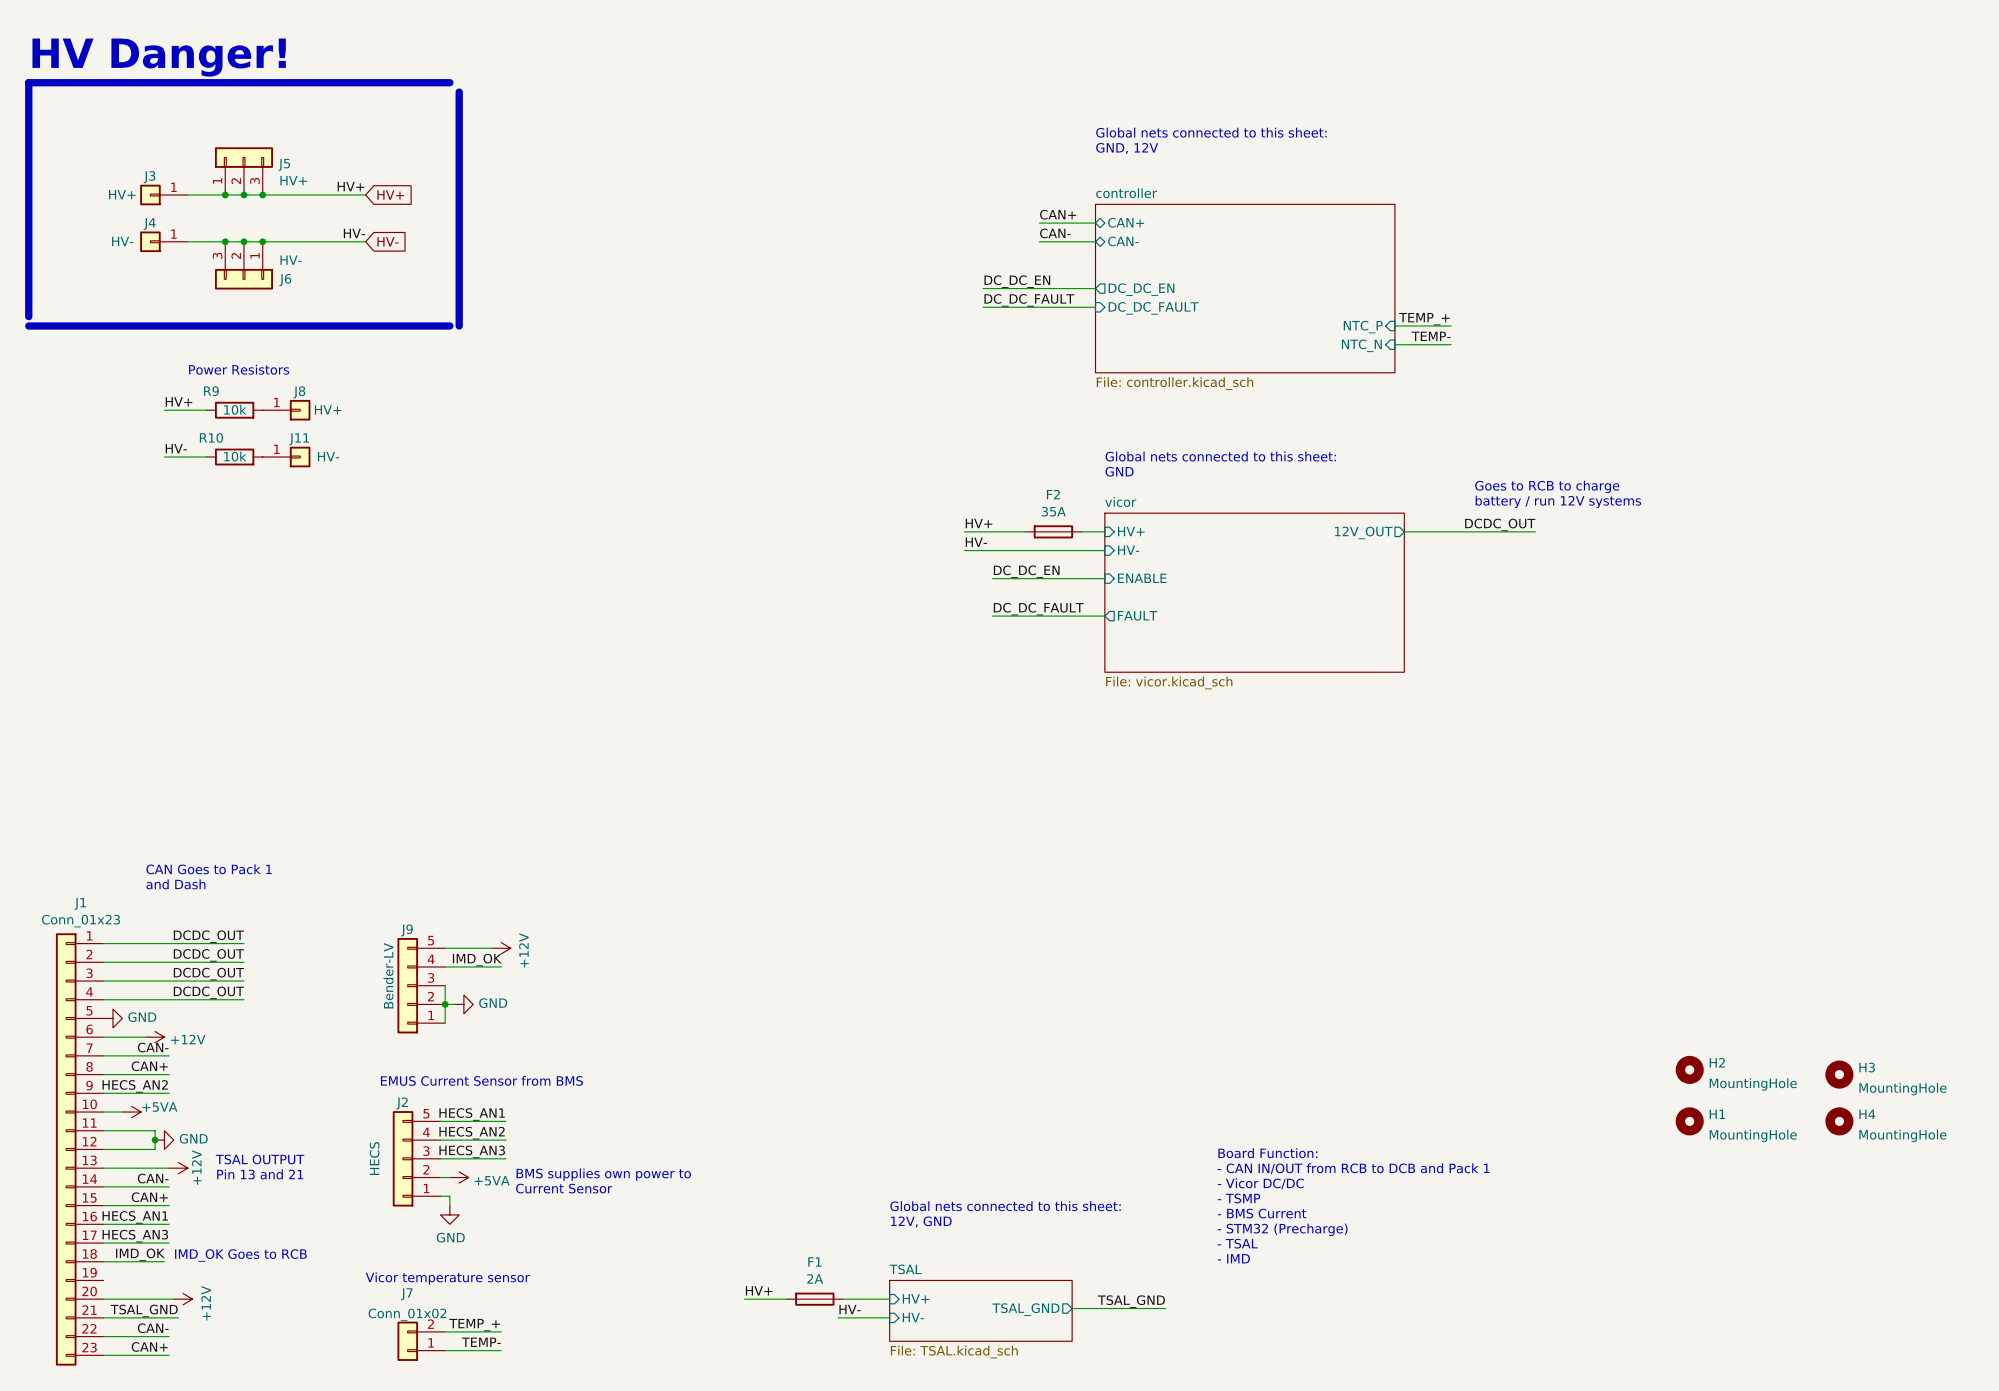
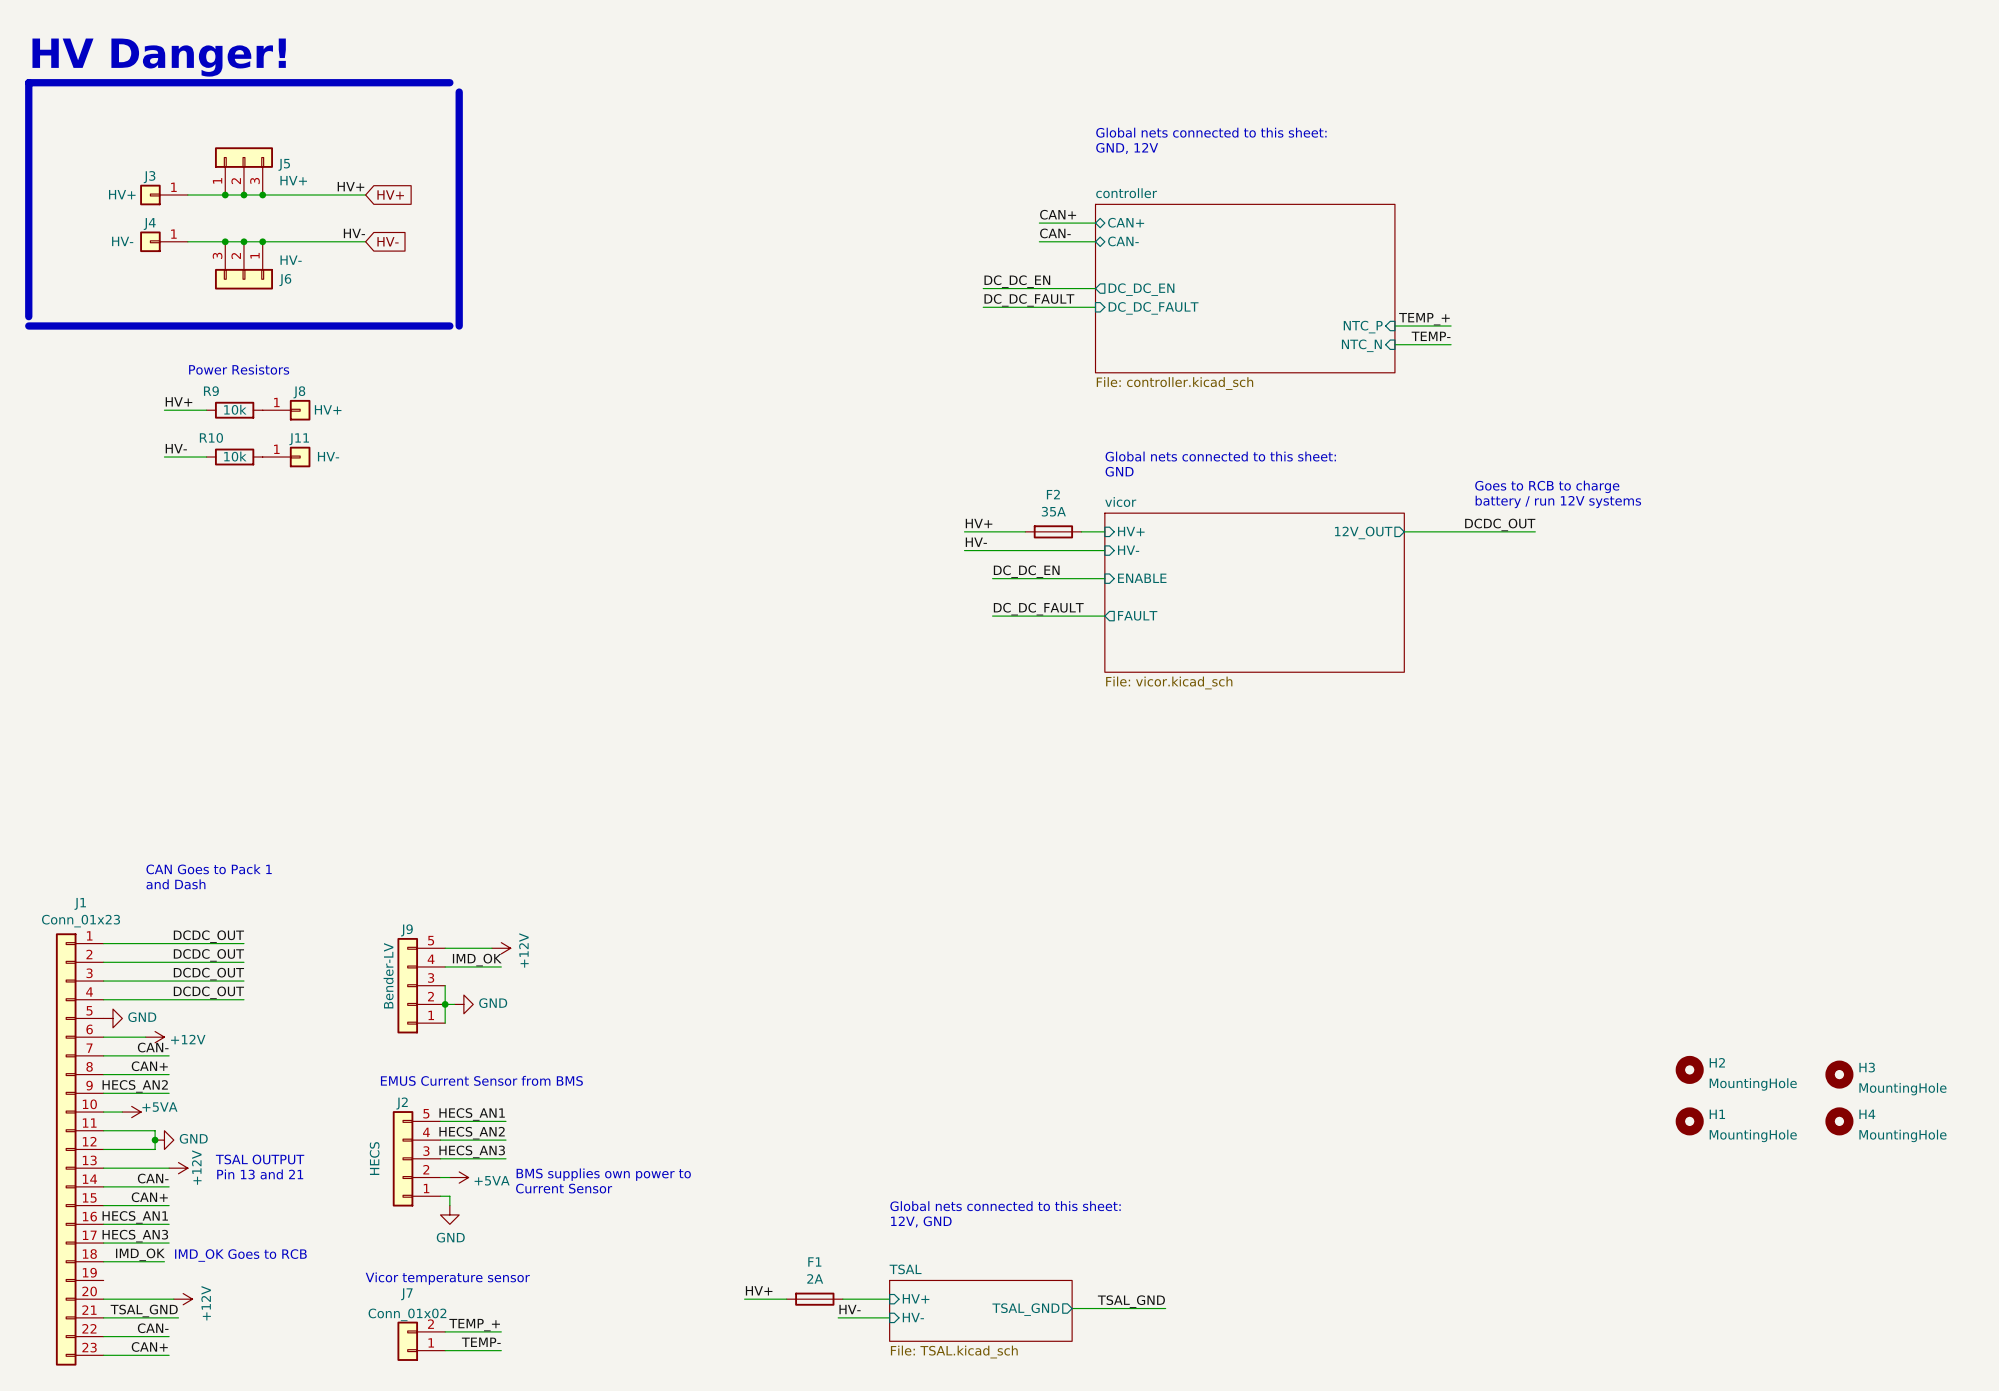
text: Board Function: (1267, 1153) -> none
text: - CAN IN/OUT from RCB to DCB and Pack 1 (1353, 1168) -> none
text: - Vicor DC/DC (1260, 1183) -> none
text: - TSMP (1239, 1198) -> none
text: - BMS Current (1262, 1213) -> none
text: - STM32 (Precharge) (1282, 1229) -> none
text: - TSAL (1237, 1243) -> none
text: - IMD (1233, 1258) -> none

